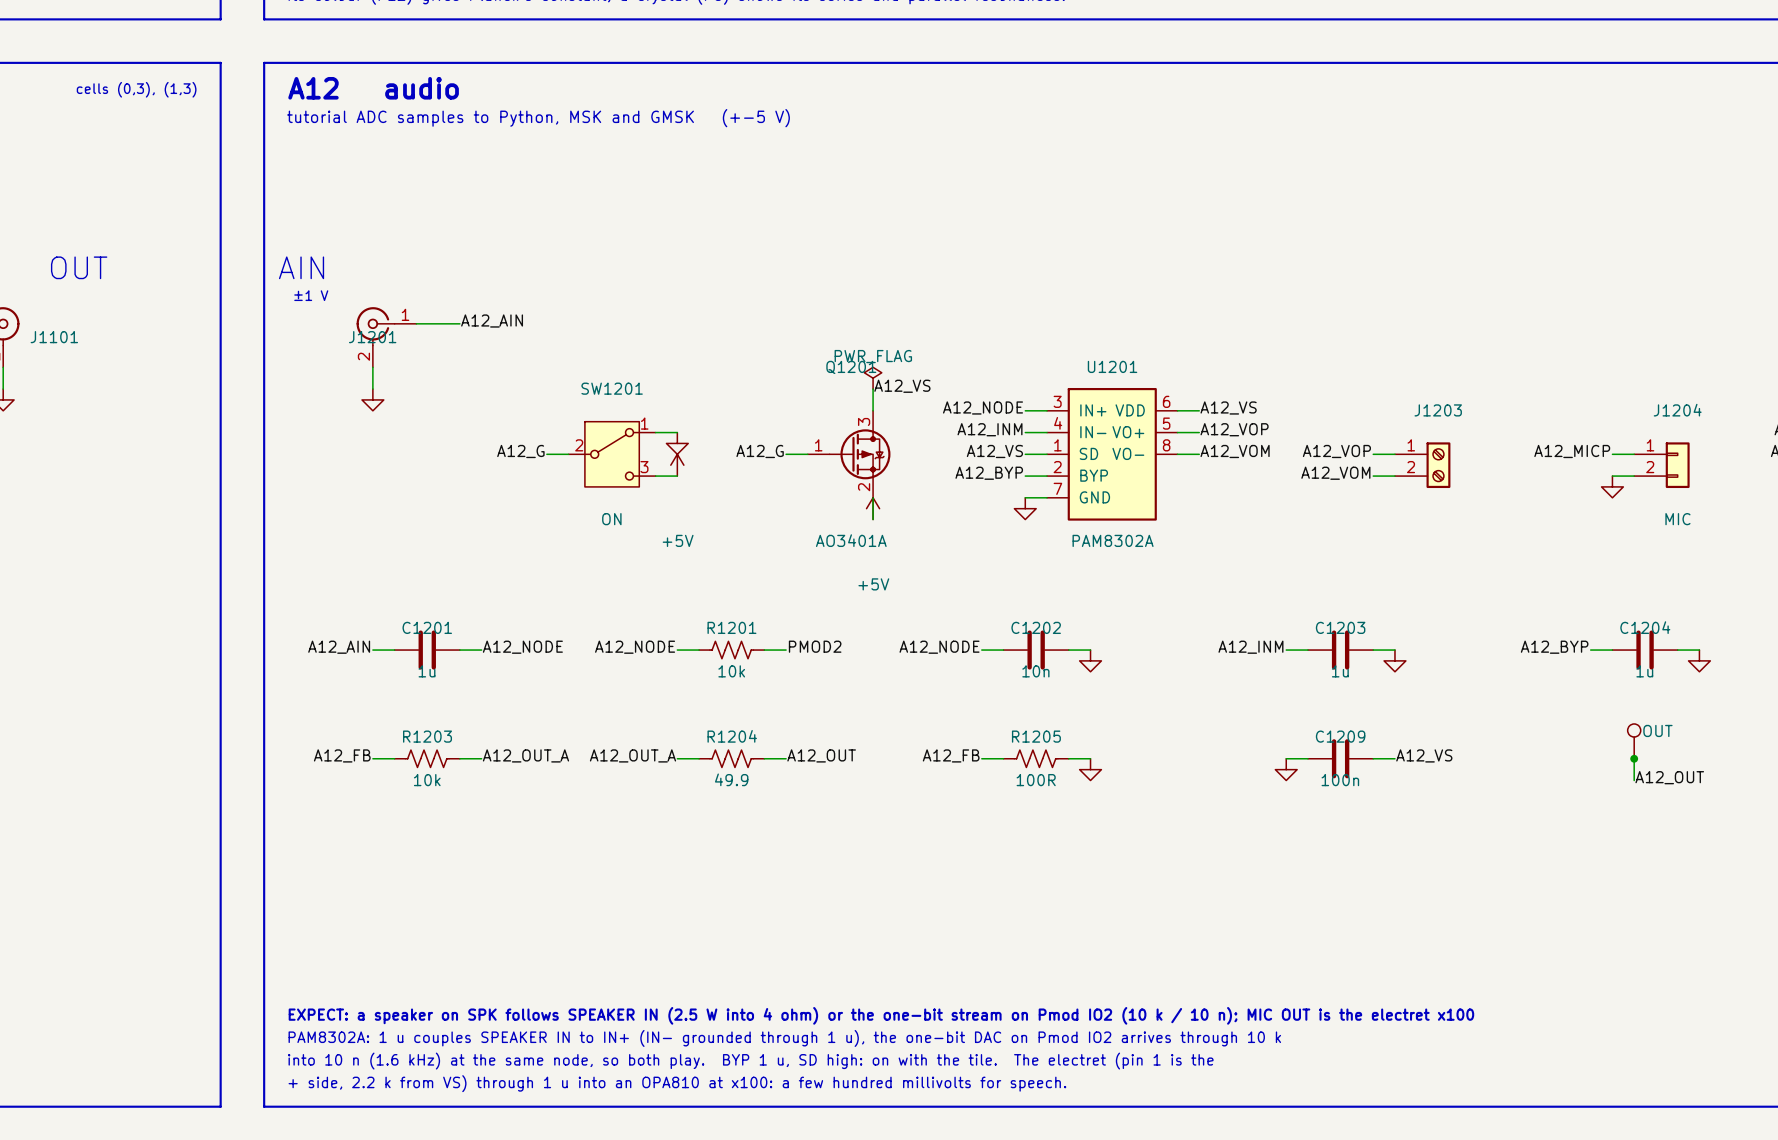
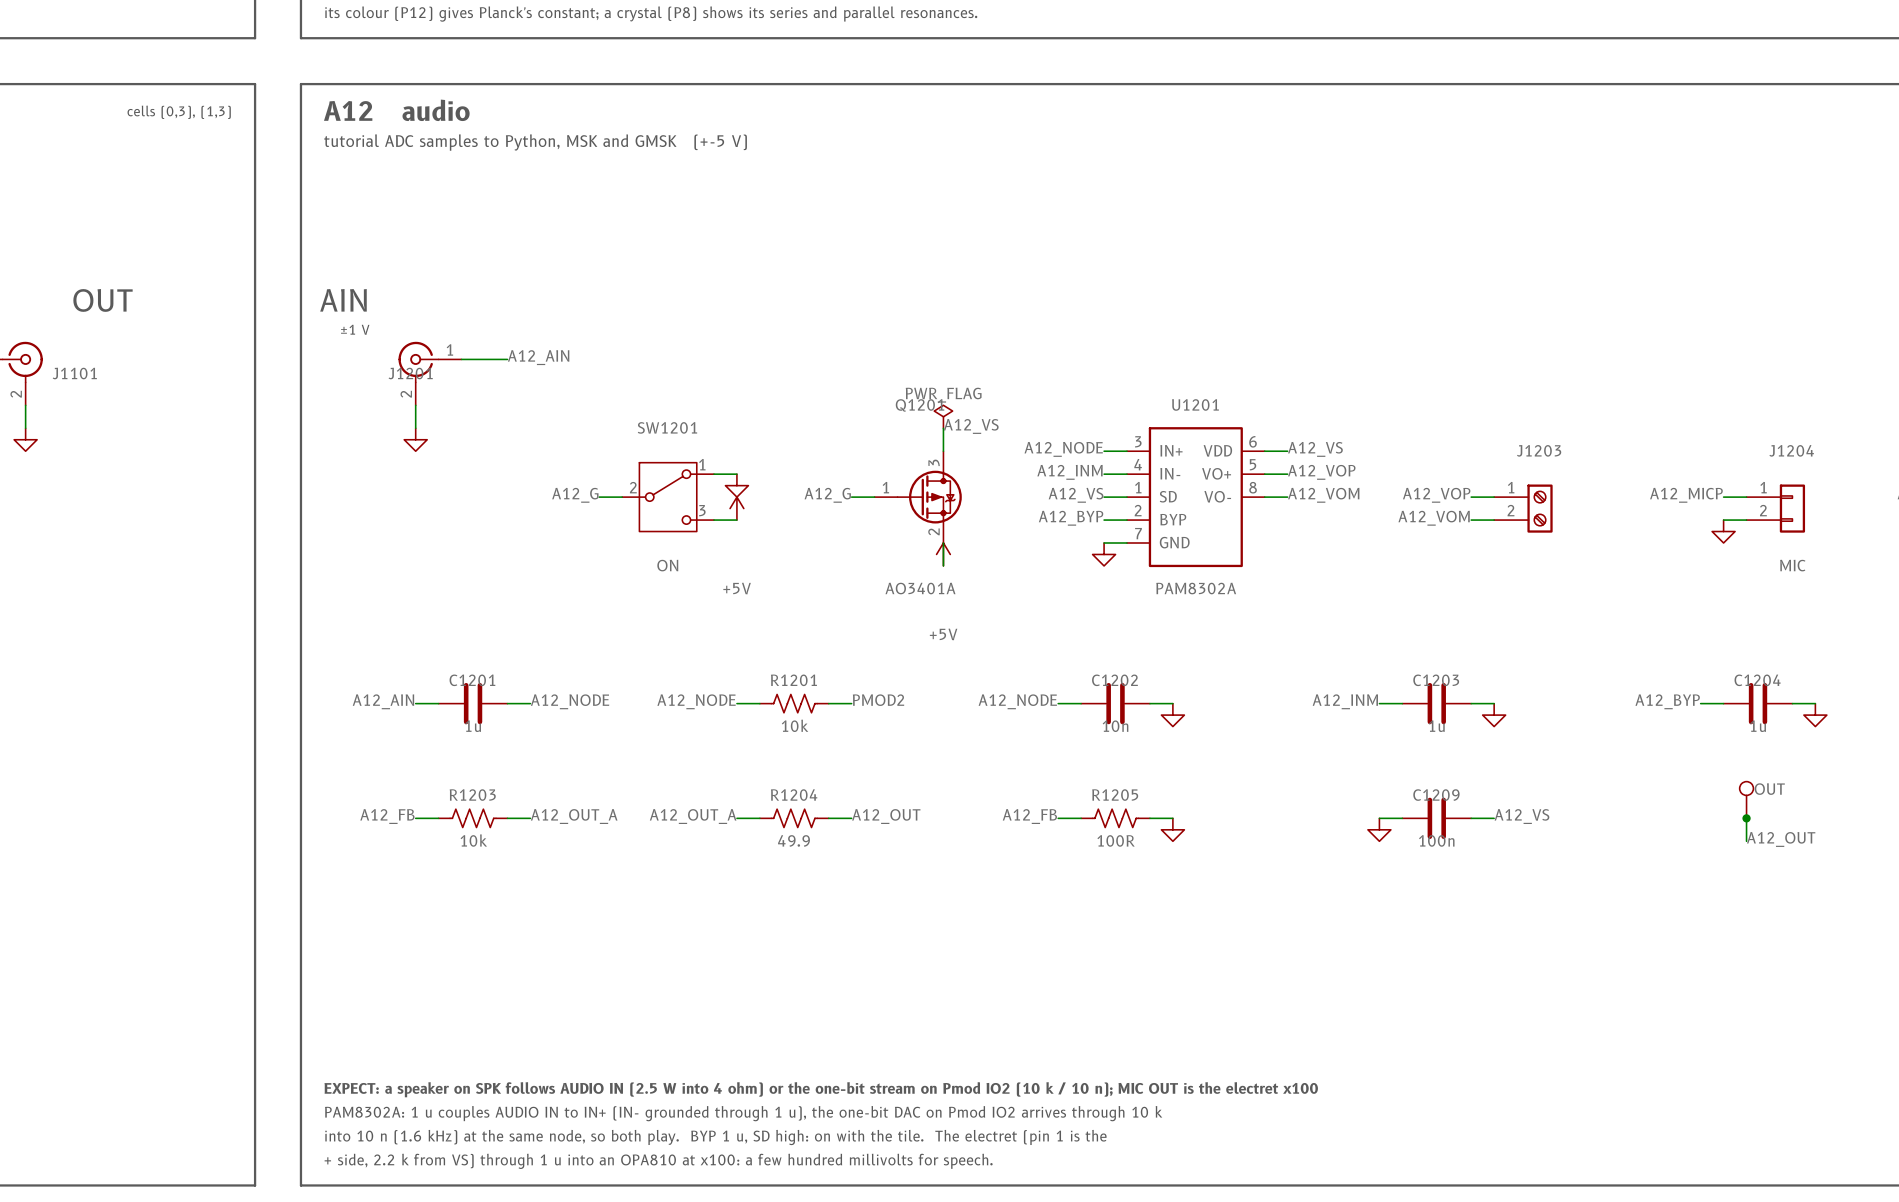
text: EXPECT: a speaker on SPK follows SPEAKER IN (2.5 W into 4 ohm) or the one-bit stream on Pmod IO2 (10 k / 10 n); MIC OUT is the electret x100 (881, 1015) -> EXPECT: a speaker on SPK follows AUDIO IN (2.5 W into 4 ohm) or the one-bit stream on Pmod IO2 (10 k / 10 n); MIC OUT is the electret x100 (821, 1089)
text: PAM8302A: 1 u couples SPEAKER IN to IN+ (IN- grounded through 1 u), the one-bit DAC on Pmod IO2 arrives through 10 k (784, 1038) -> PAM8302A: 1 u couples AUDIO IN to IN+ (IN- grounded through 1 u), the one-bit DAC on Pmod IO2 arrives through 10 k (743, 1113)

